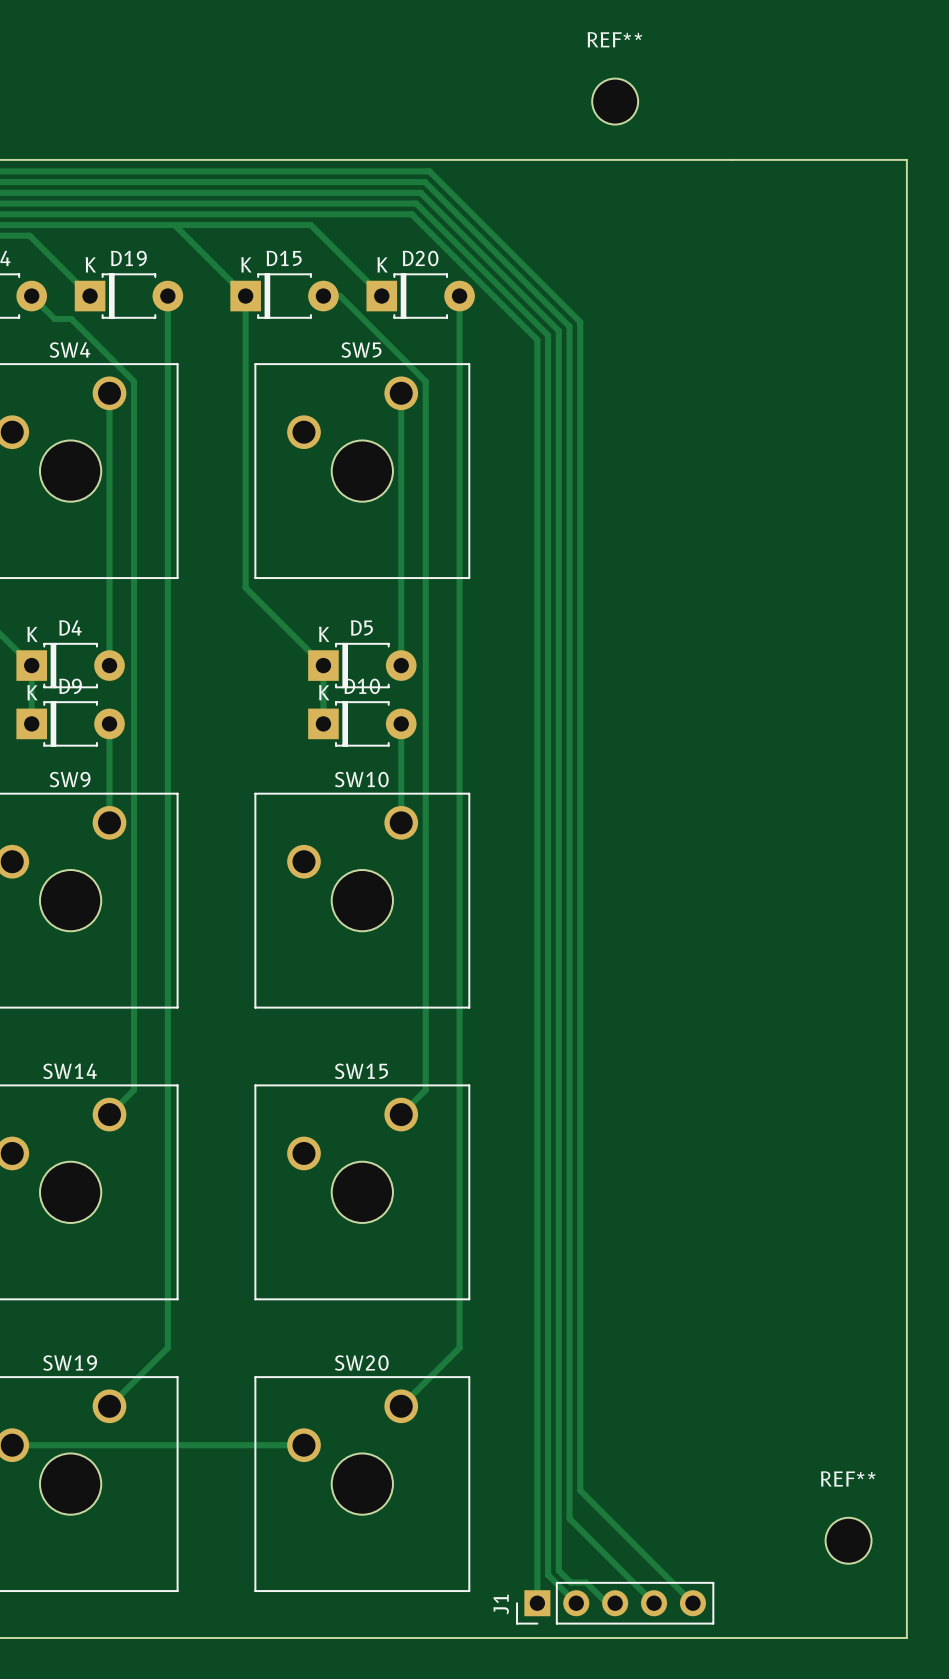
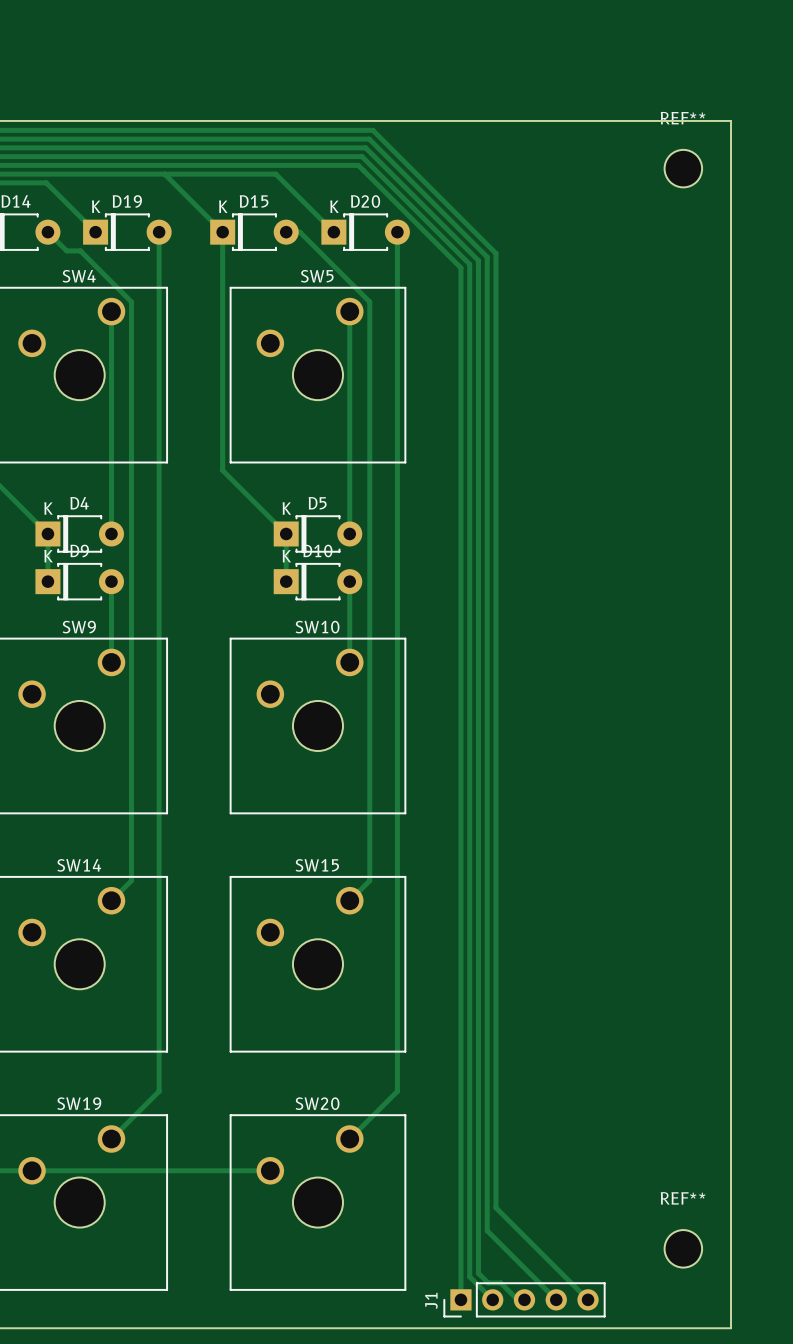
REF** position: (615, 101) -> (683, 168)
board edge: (868, 159) (906, 159) (906, 1637) (868, 1637) -> (731, 120) (731, 1328)
REF** position: (848, 1540) -> (683, 1248)

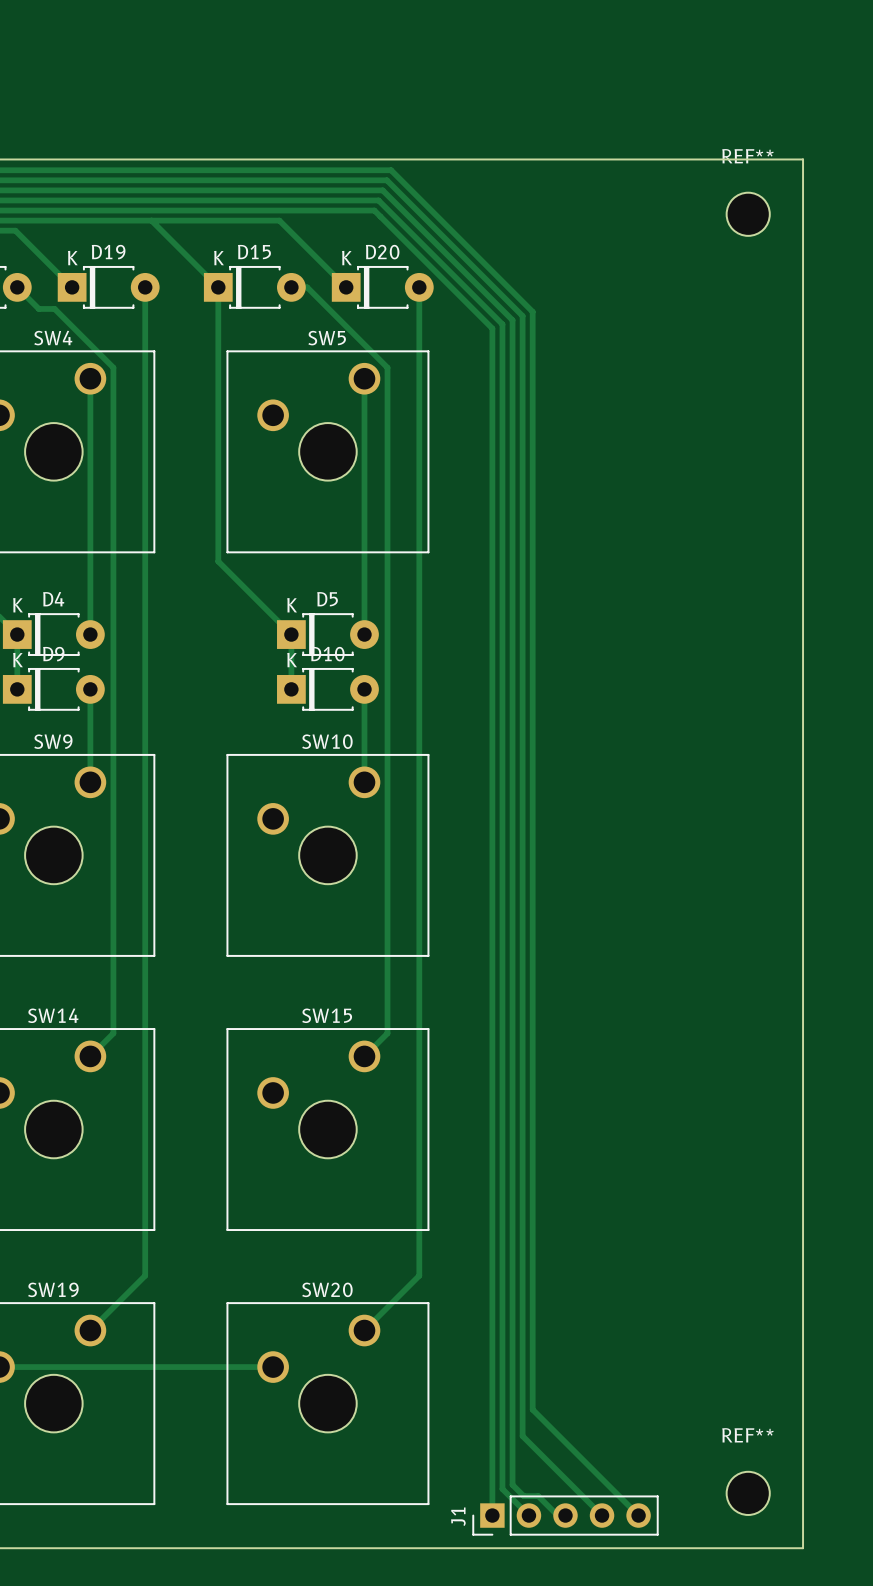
REF** position: (683, 1248) -> (748, 1493)

